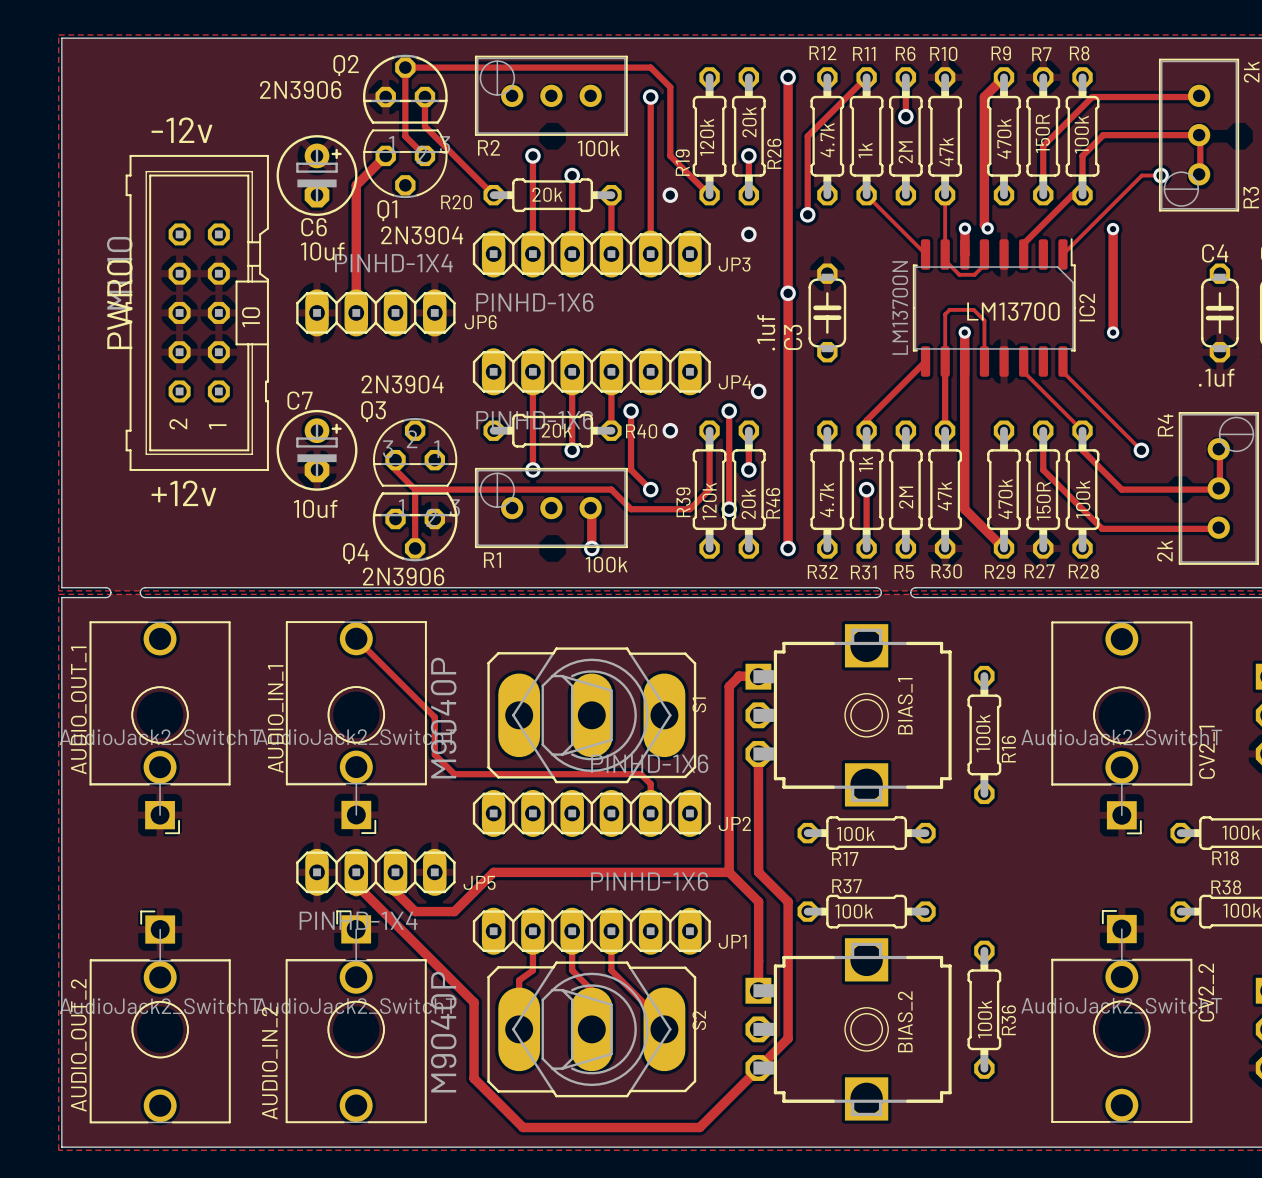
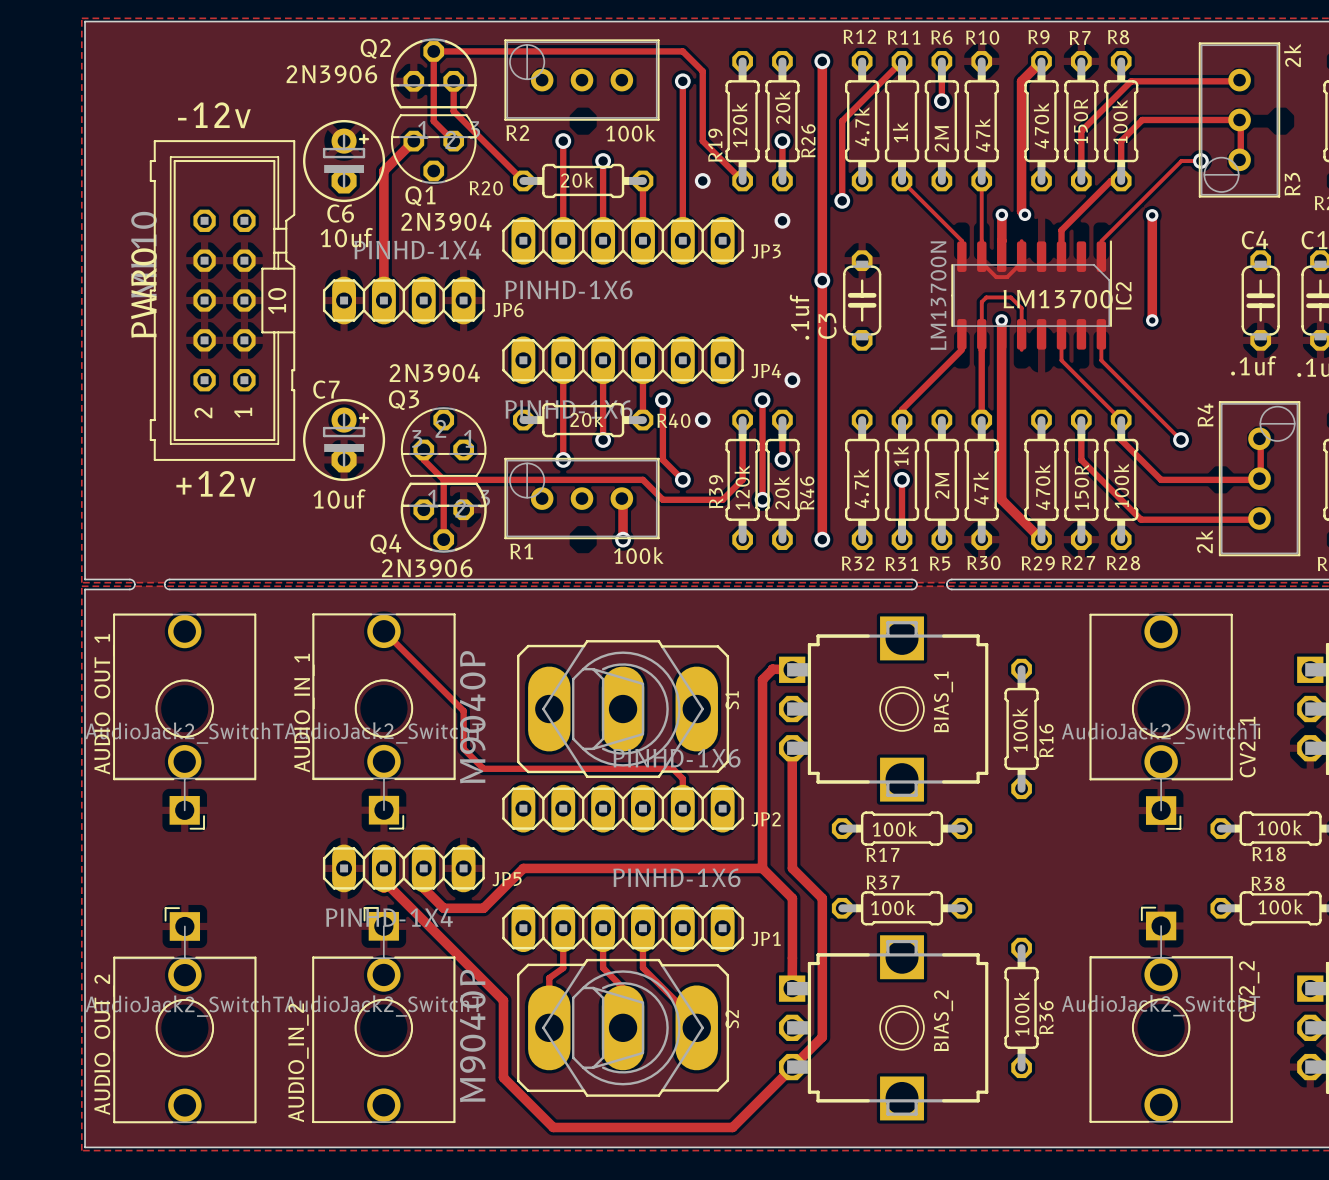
IC2 footprint: [912, 238, 1076, 377] -> [951, 240, 1112, 350]
track: (945, 260) (959, 274) (974, 274) (984, 264) -> none
track: none -> (981, 256) (981, 262) (996, 277) (1007, 277) (1021, 262) (1021, 256)

